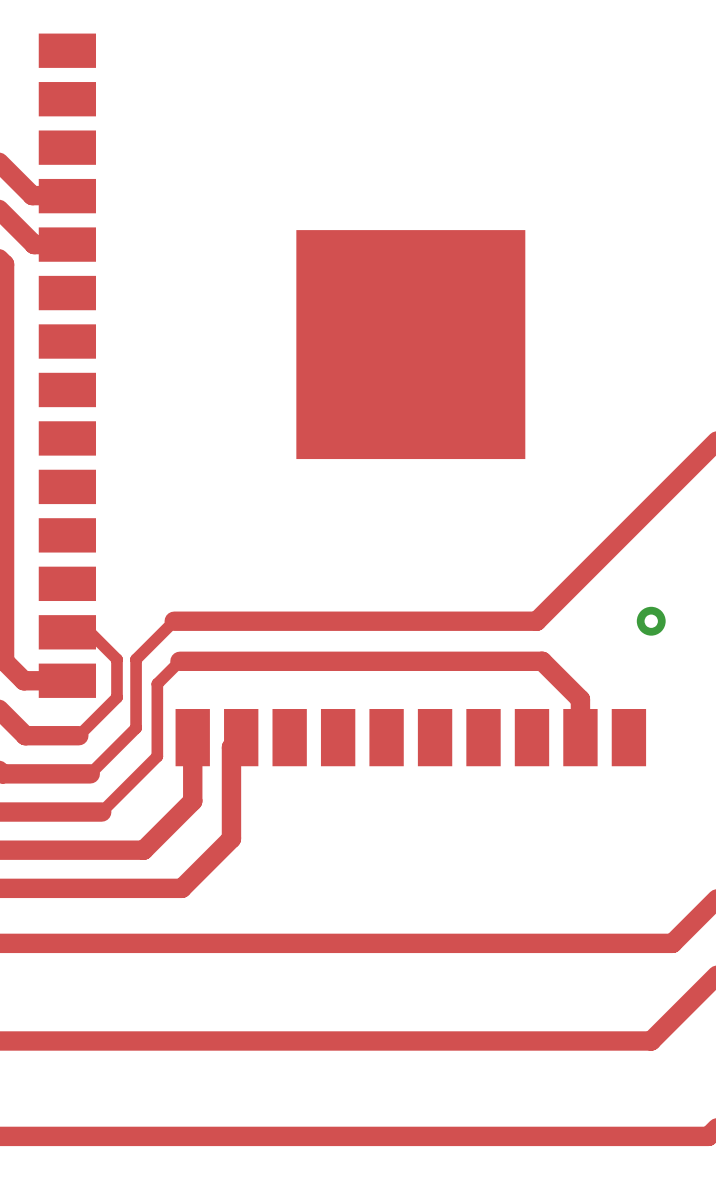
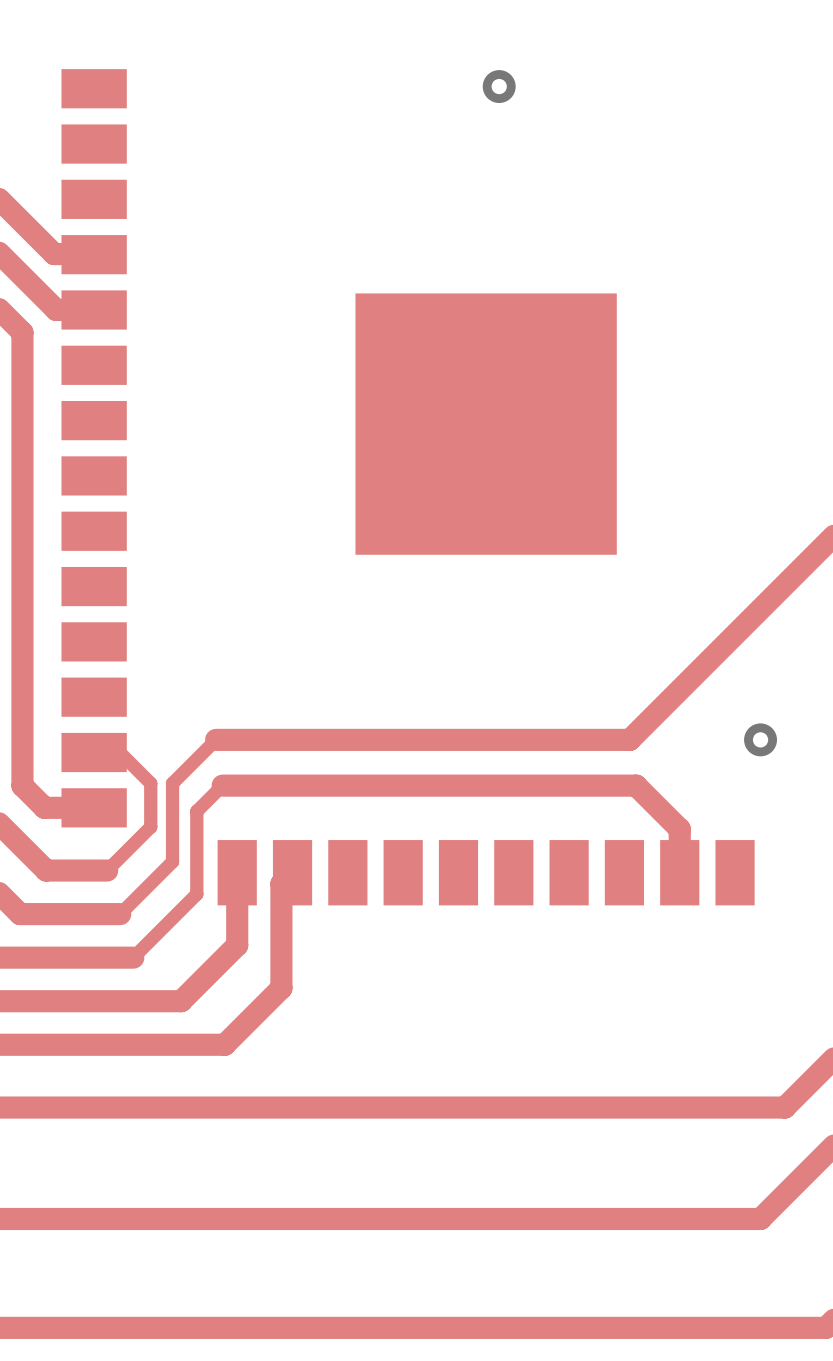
via: none -> (499, 86)

